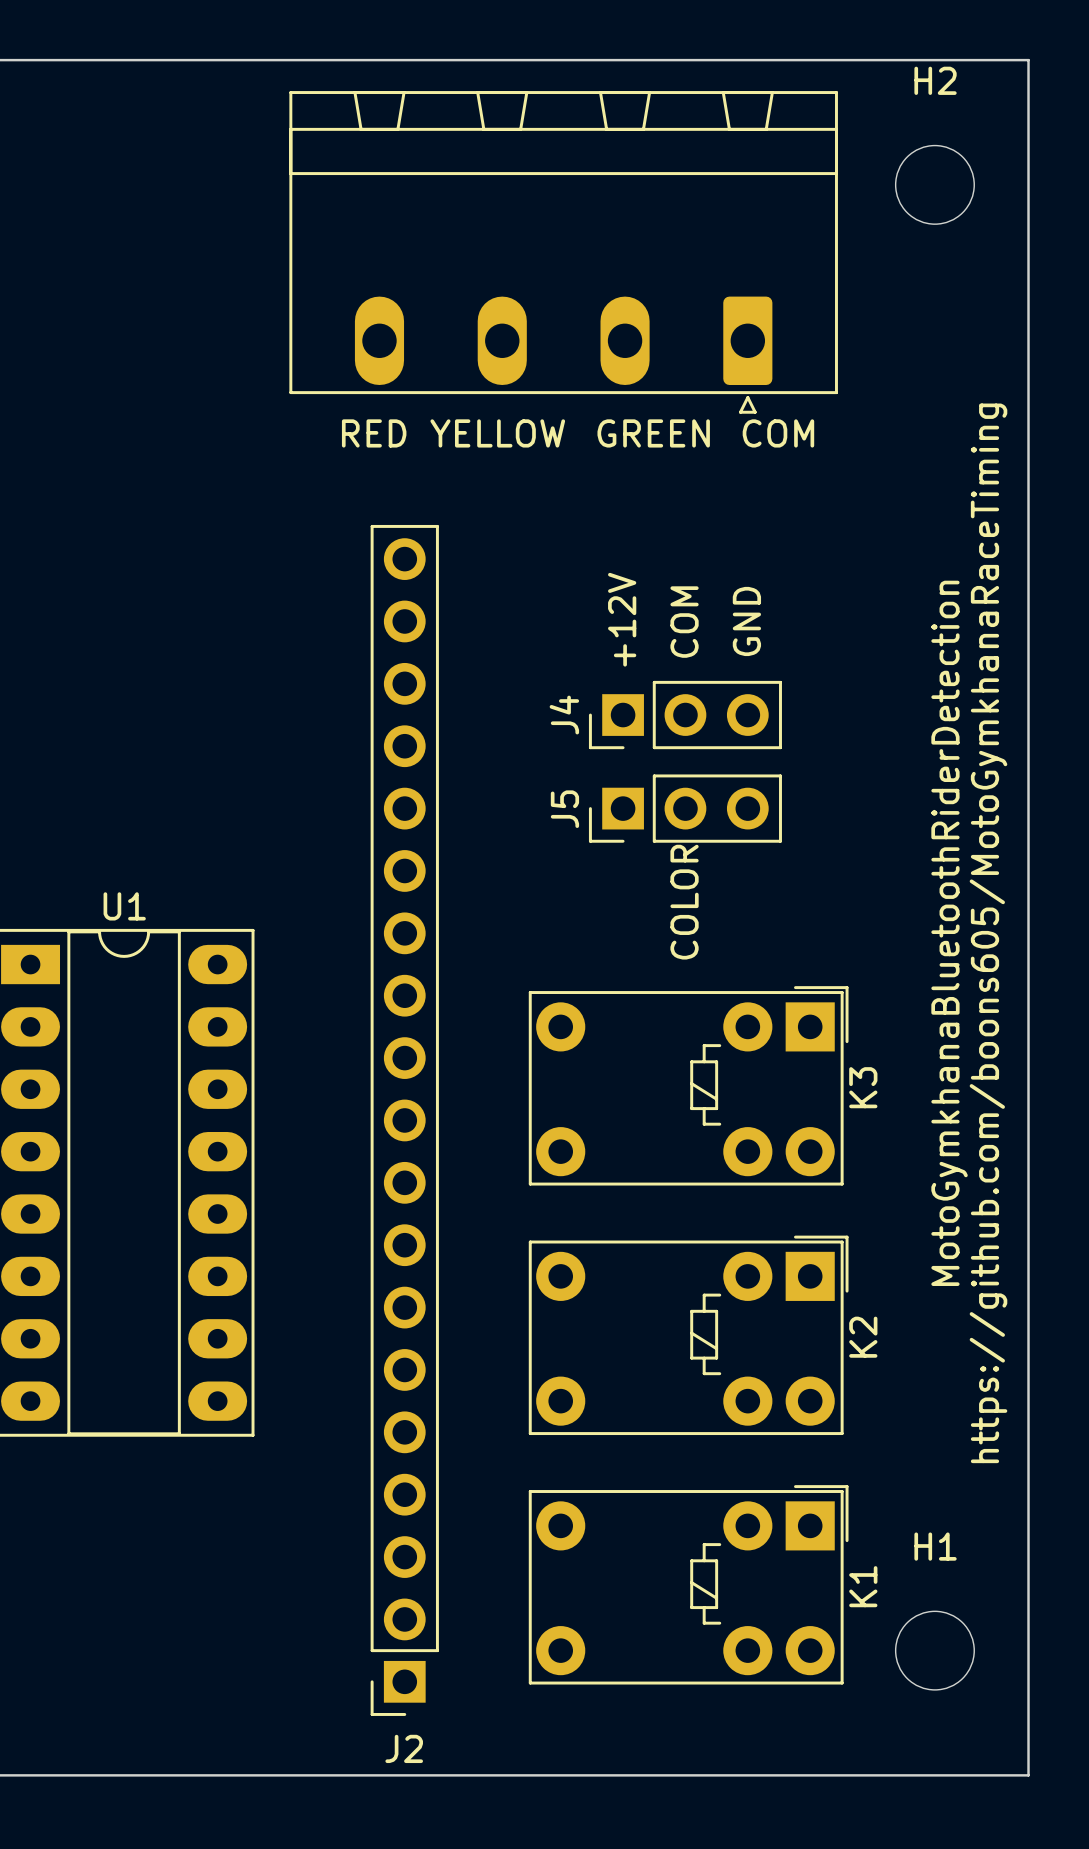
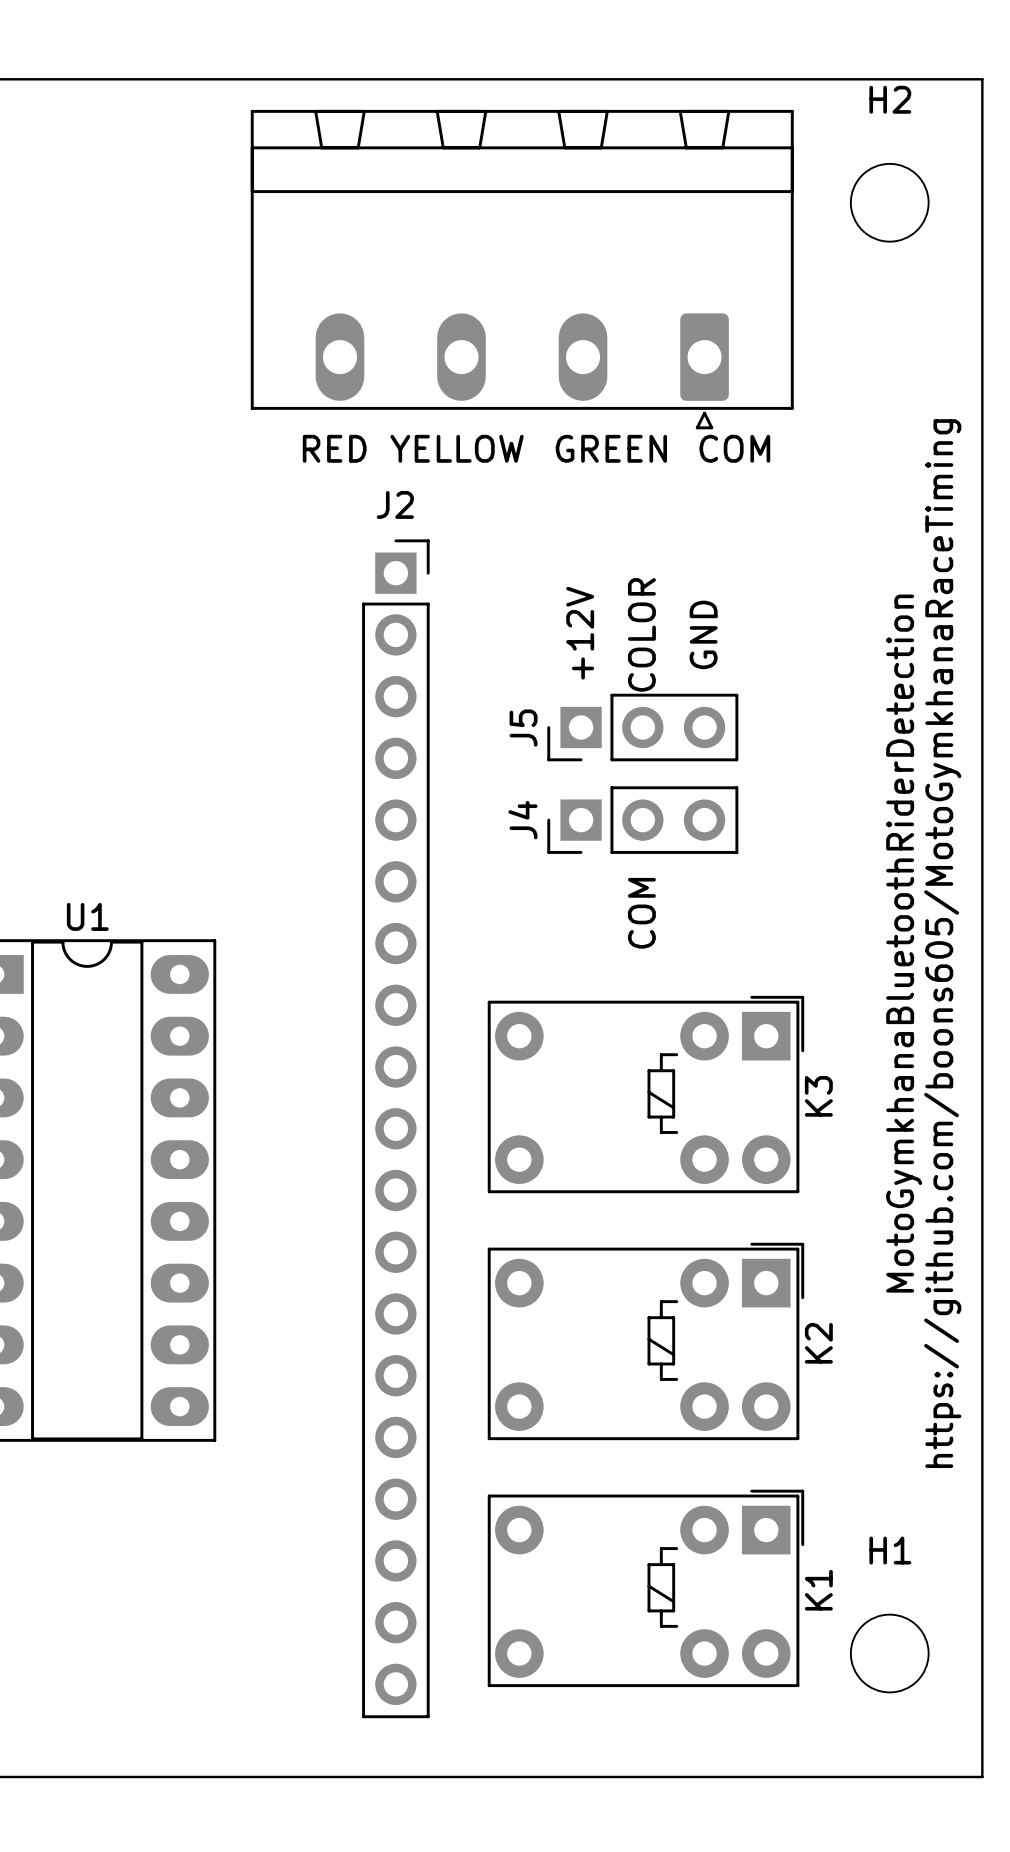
text: COM (684, 622) -> COLOR (641, 634)
J4 name: J4 (564, 715) -> J5 (523, 728)
J5 name: J5 (564, 809) -> J4 (522, 820)
text: COLOR (684, 902) -> COM (641, 913)
J2 rotation: 0° (404, 1120) -> 180° (395, 1128)

